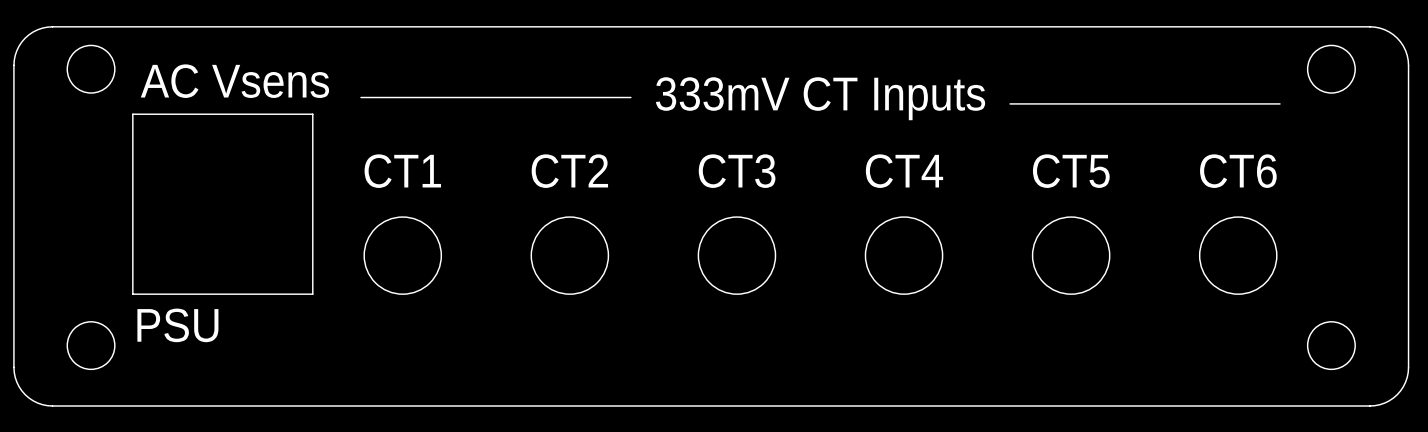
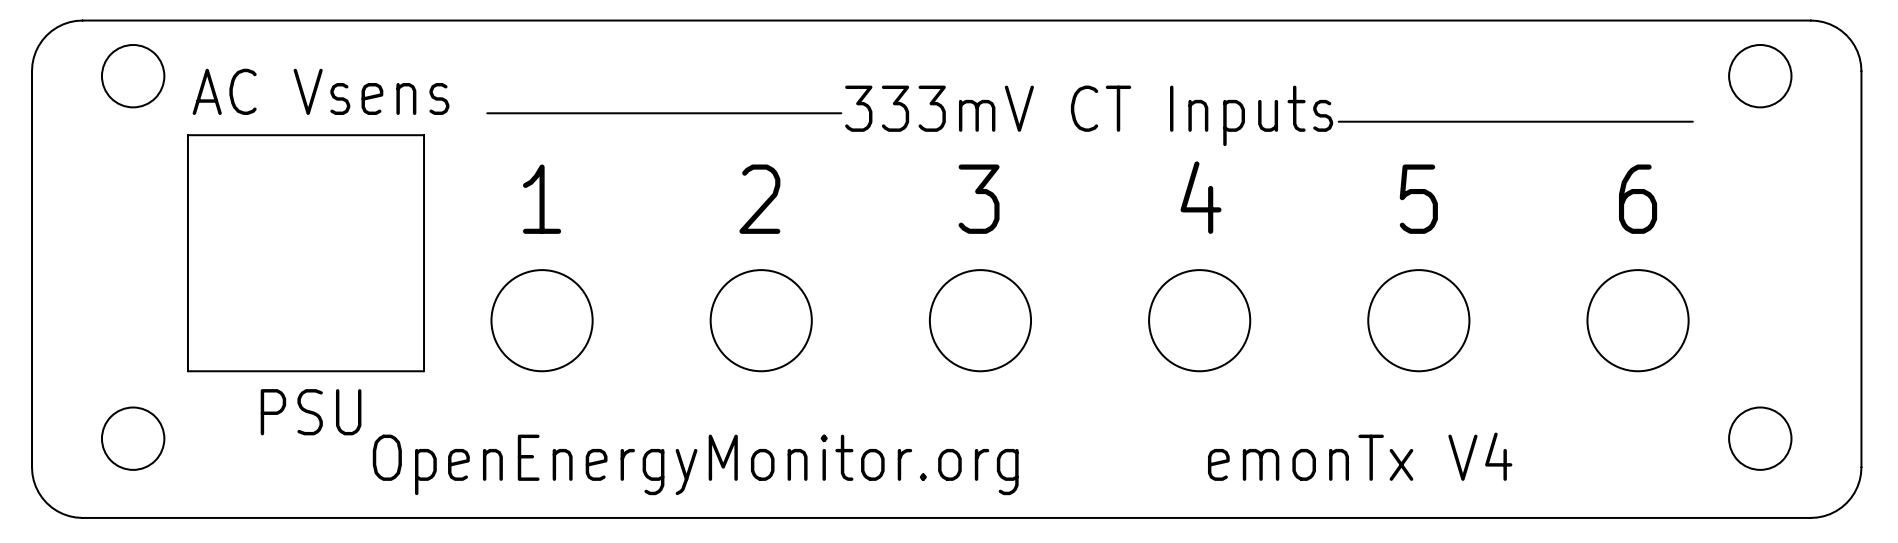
text: CT1 (402, 171) -> 1 (542, 199)
text: CT2 (569, 171) -> 2 (759, 199)
text: CT3 (737, 171) -> 3 (979, 199)
text: CT4 (904, 171) -> 4 (1201, 197)
text: CT5 (1071, 171) -> 5 (1418, 199)
text: CT6 (1238, 171) -> 6 (1638, 199)
text position: PSU (177, 325) -> PSU (311, 412)
text: none -> OpenEnergyMonitor.org emonTx V4 (942, 463)

